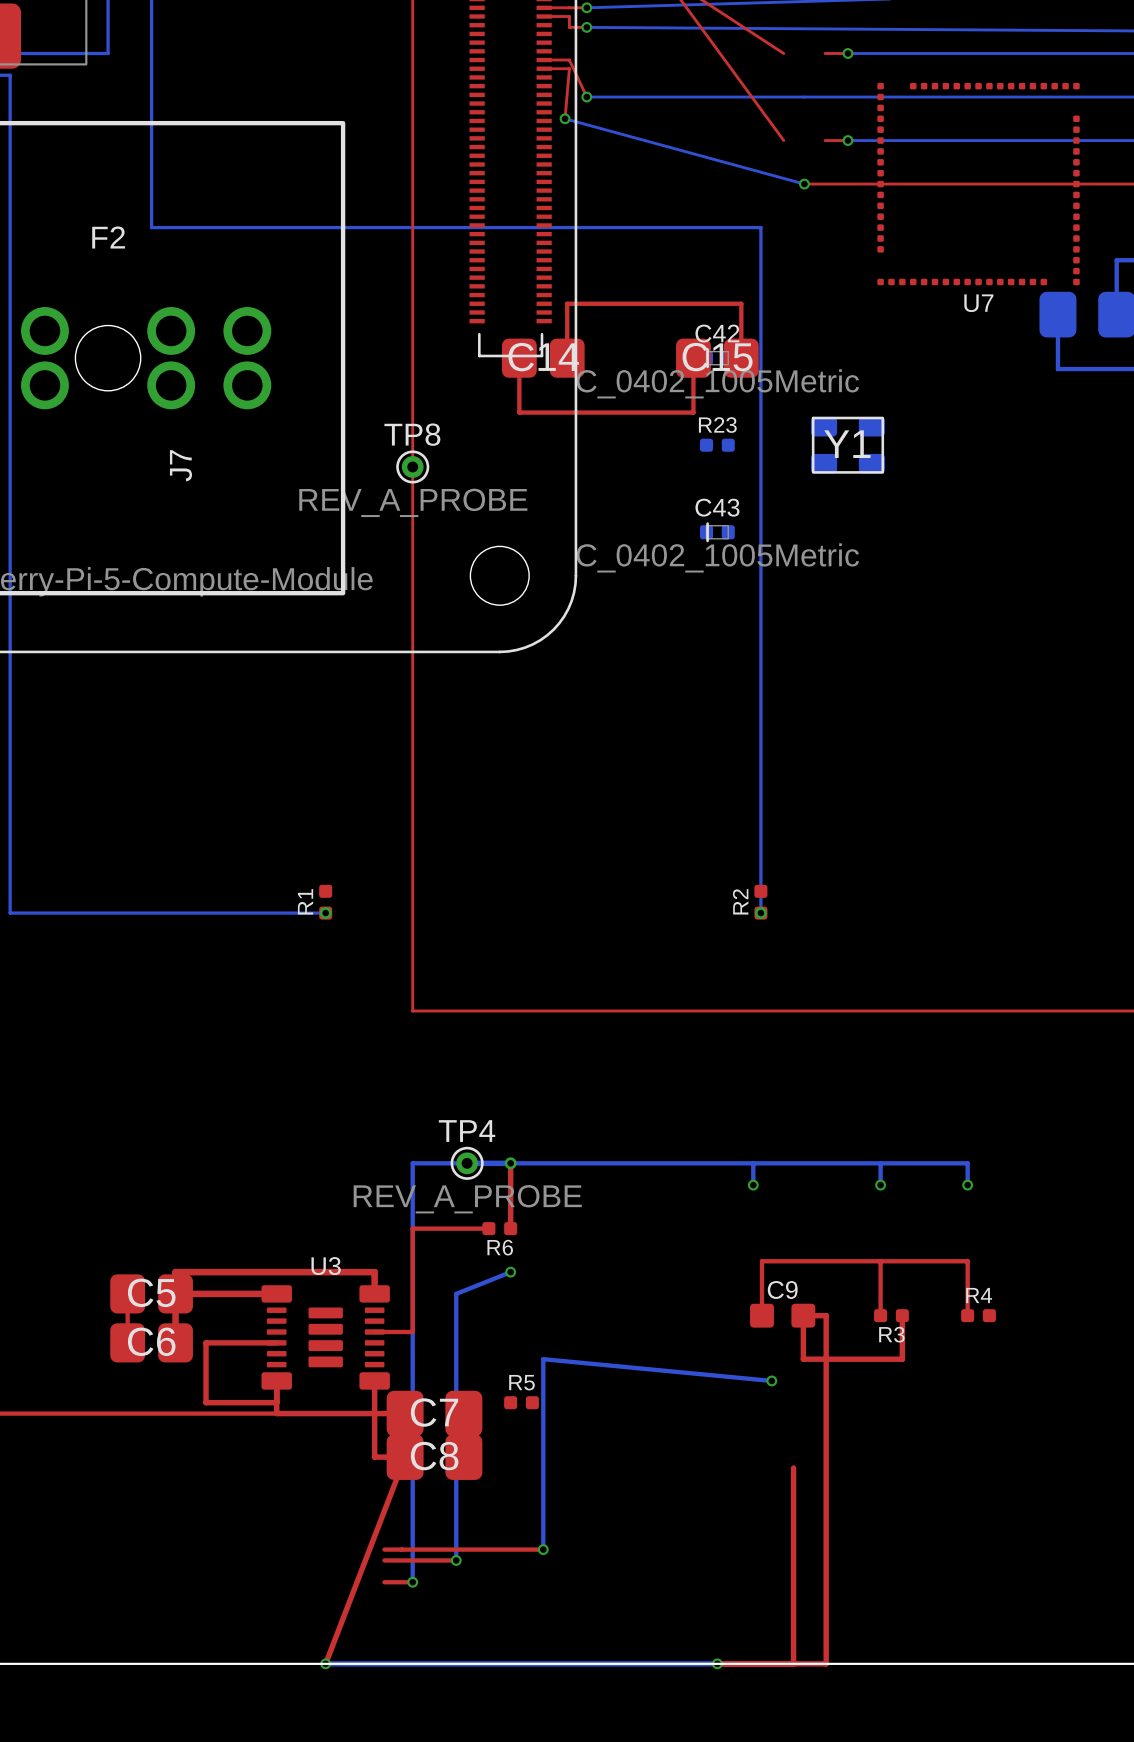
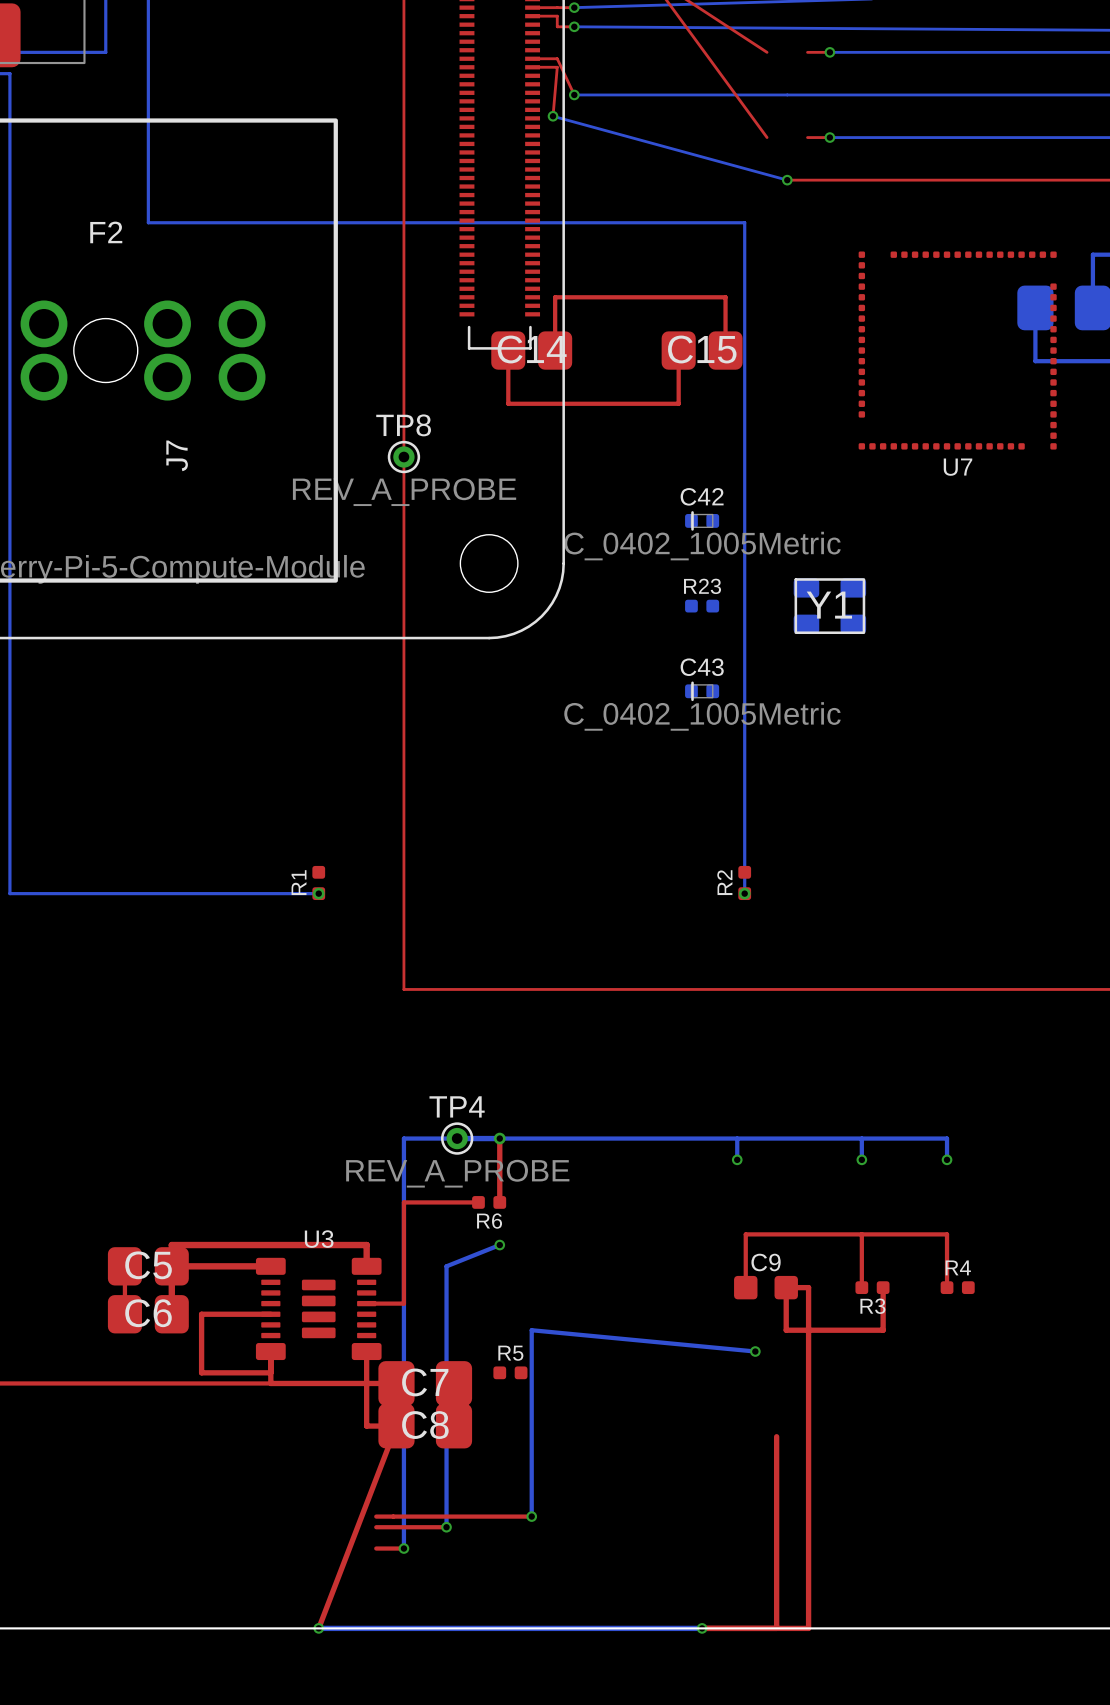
U7 position: (978, 184) -> (957, 350)
C42: C_0402_1005Metric (717, 358) -> none
R23 position: (717, 445) -> (702, 606)
Y1 position: (847, 445) -> (829, 606)
C43 name: C43 (717, 507) -> C42 (702, 496)
C43: none -> C_0402_1005Metric (702, 691)

